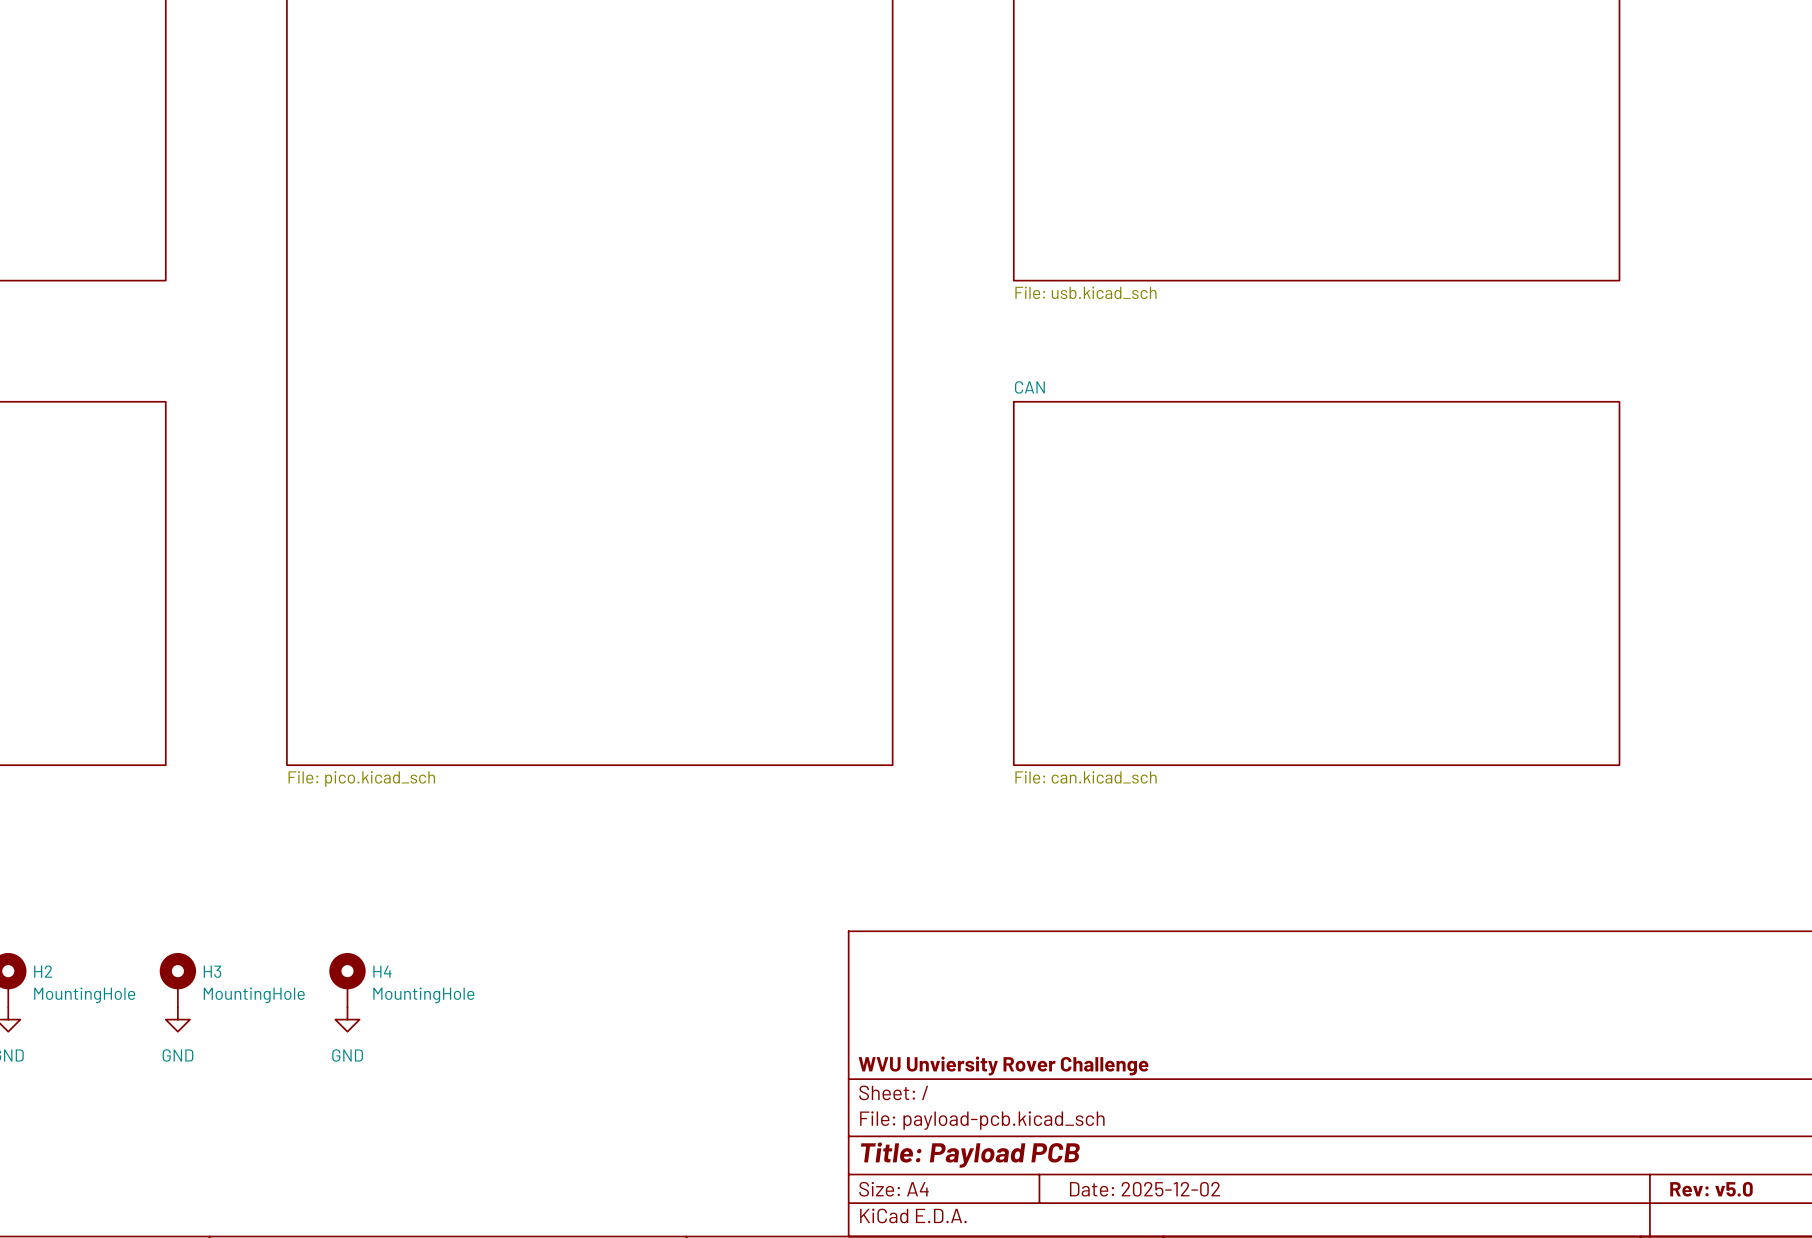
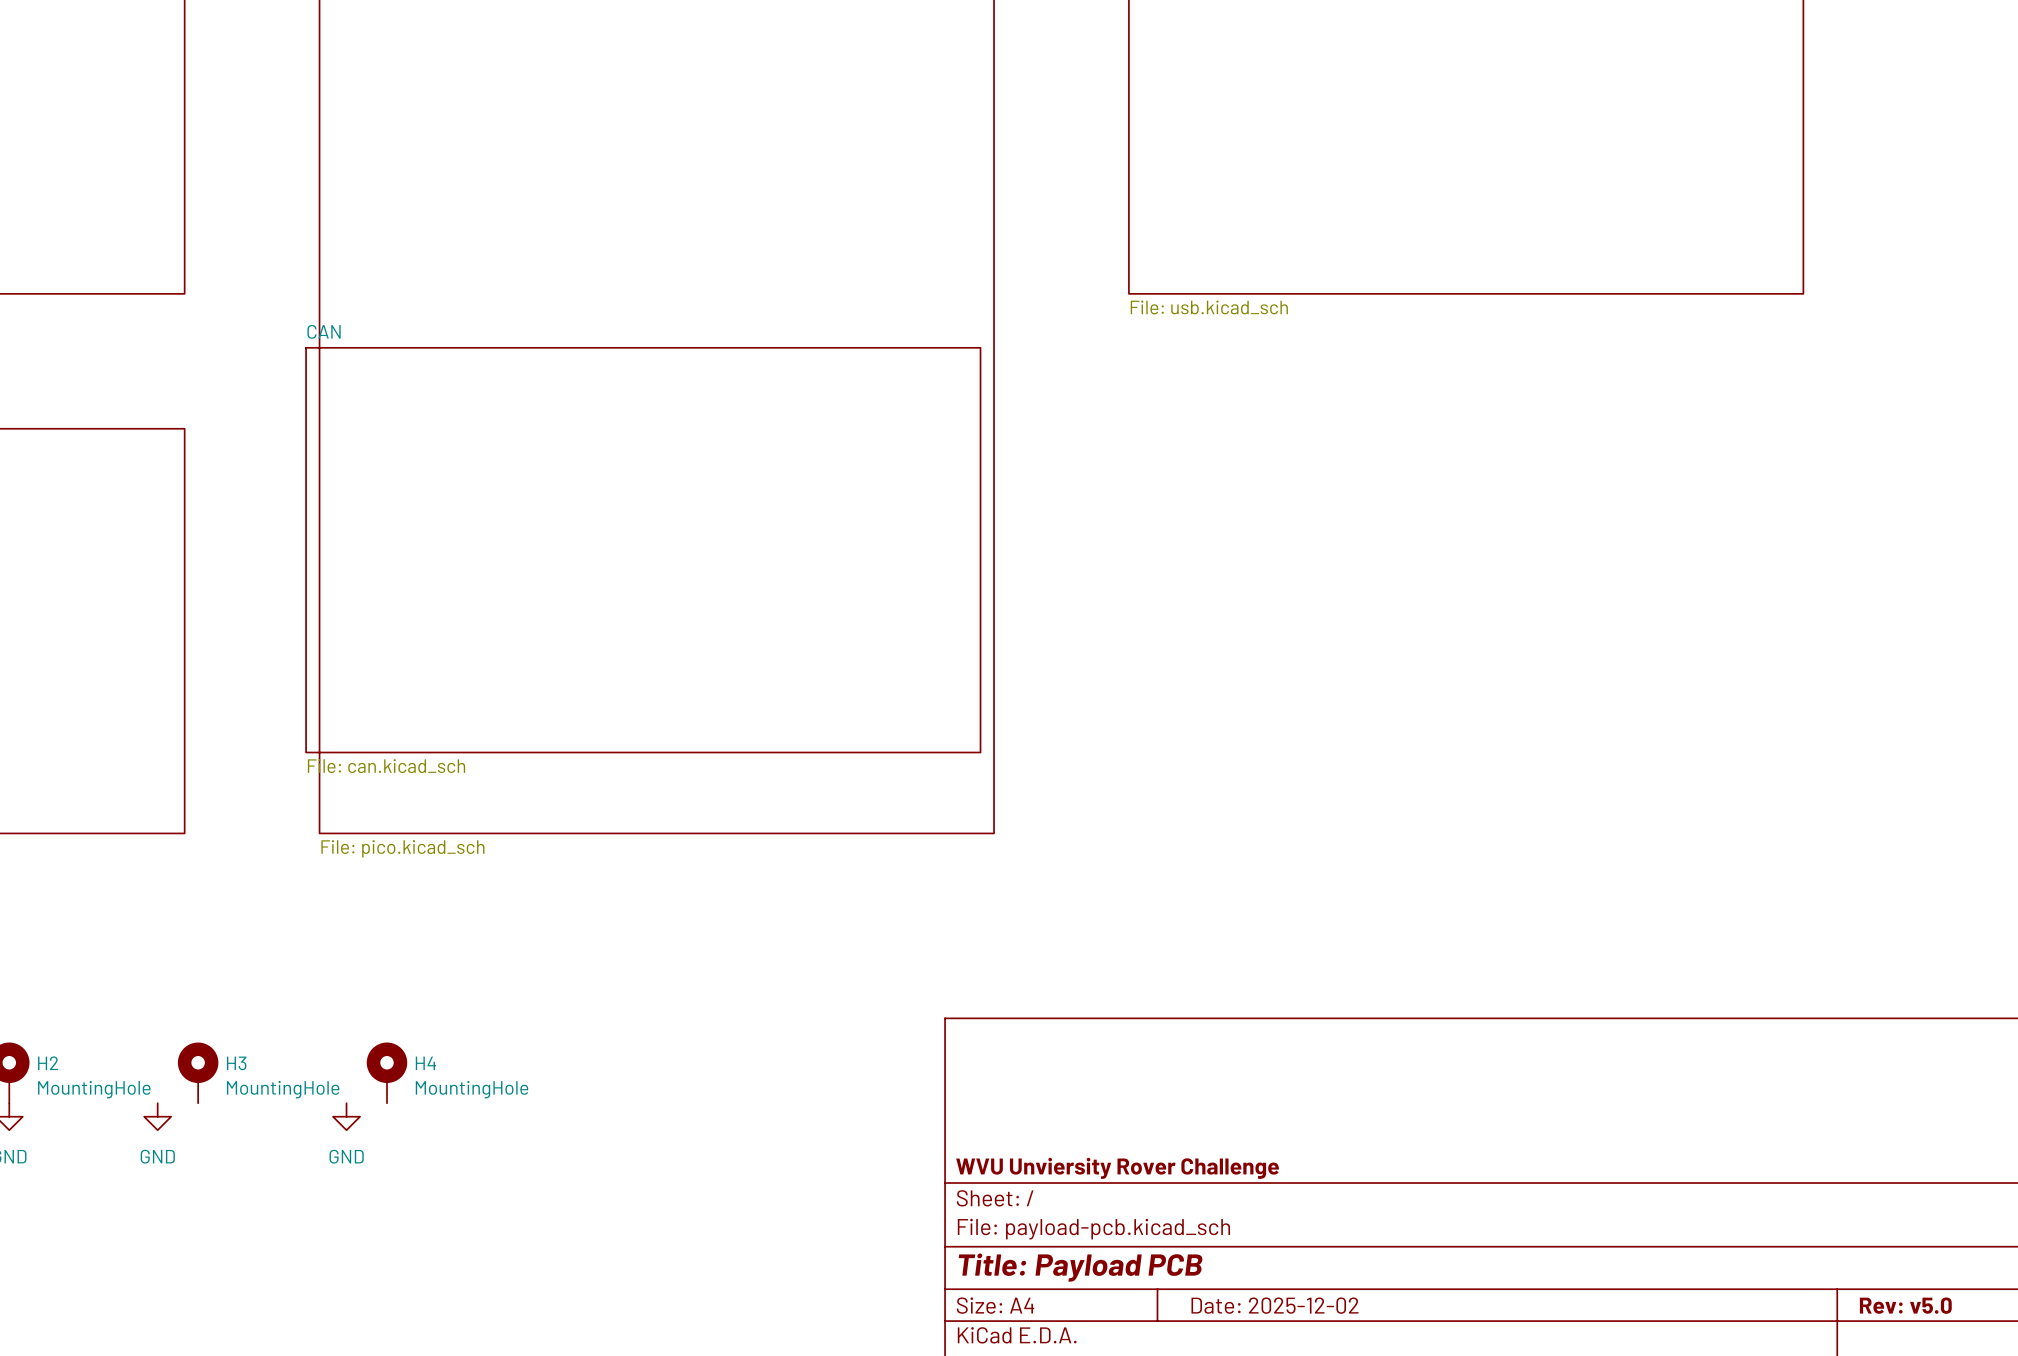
sheet CAN: none -> File: can.kicad_sch (643, 550)
sheet CAN: File: can.kicad_sch (1316, 583) -> none
power symbol position: GND (177, 1019) -> GND (157, 1116)
power symbol position: GND (347, 1019) -> GND (346, 1116)

